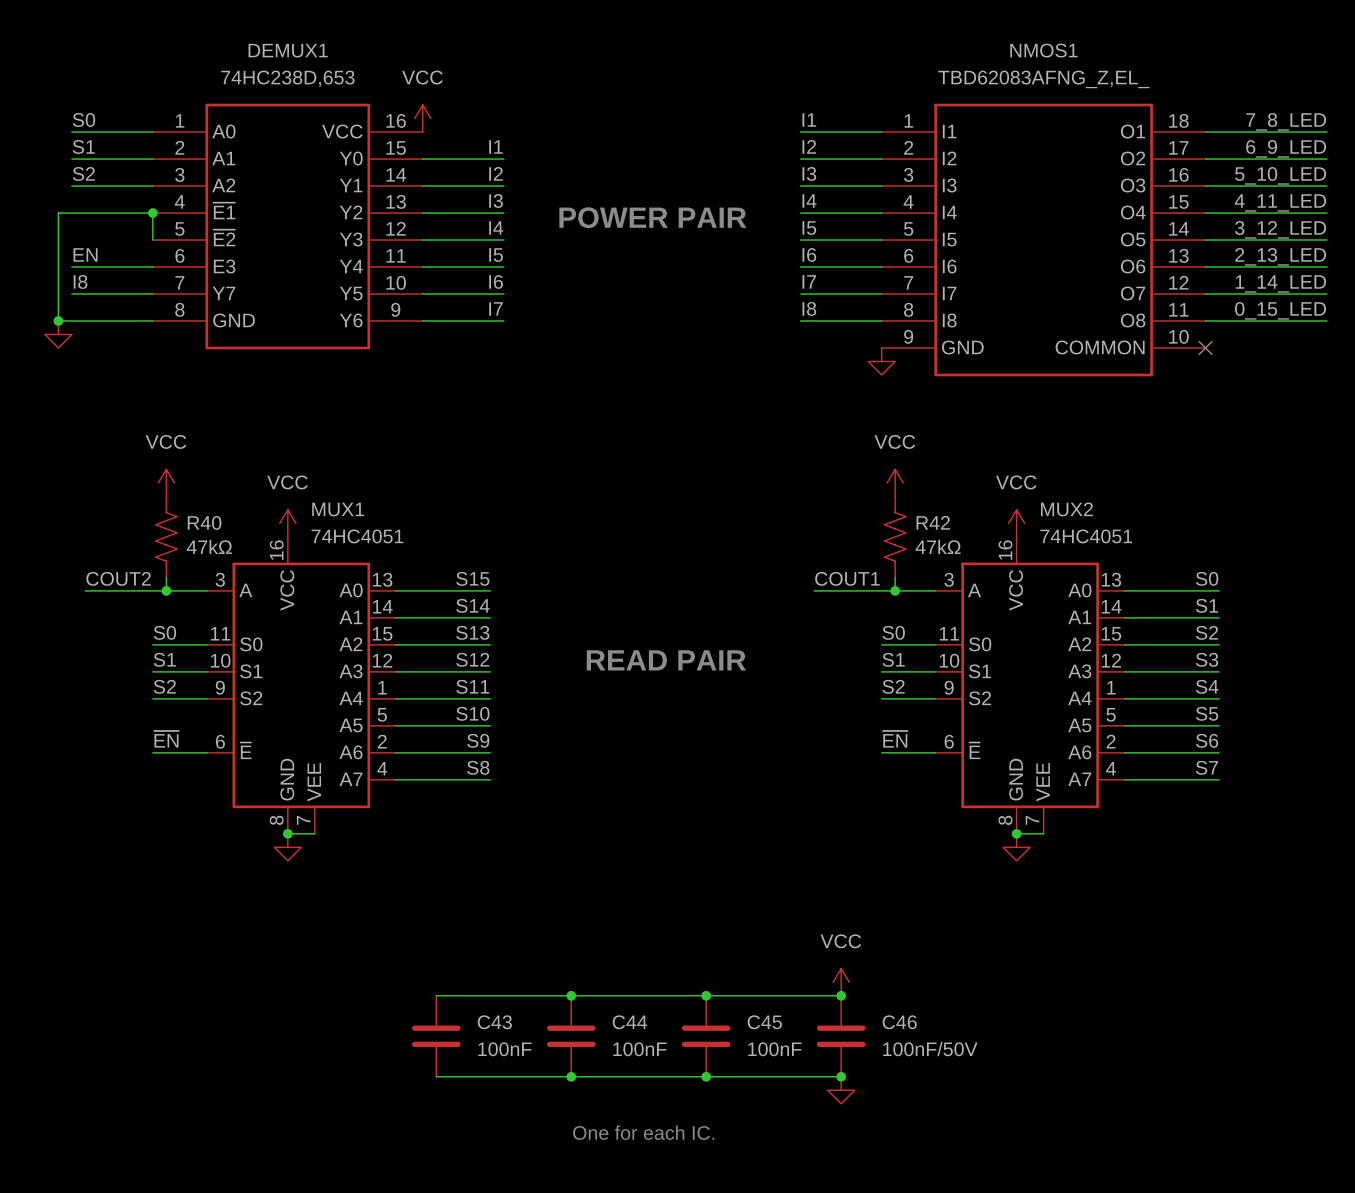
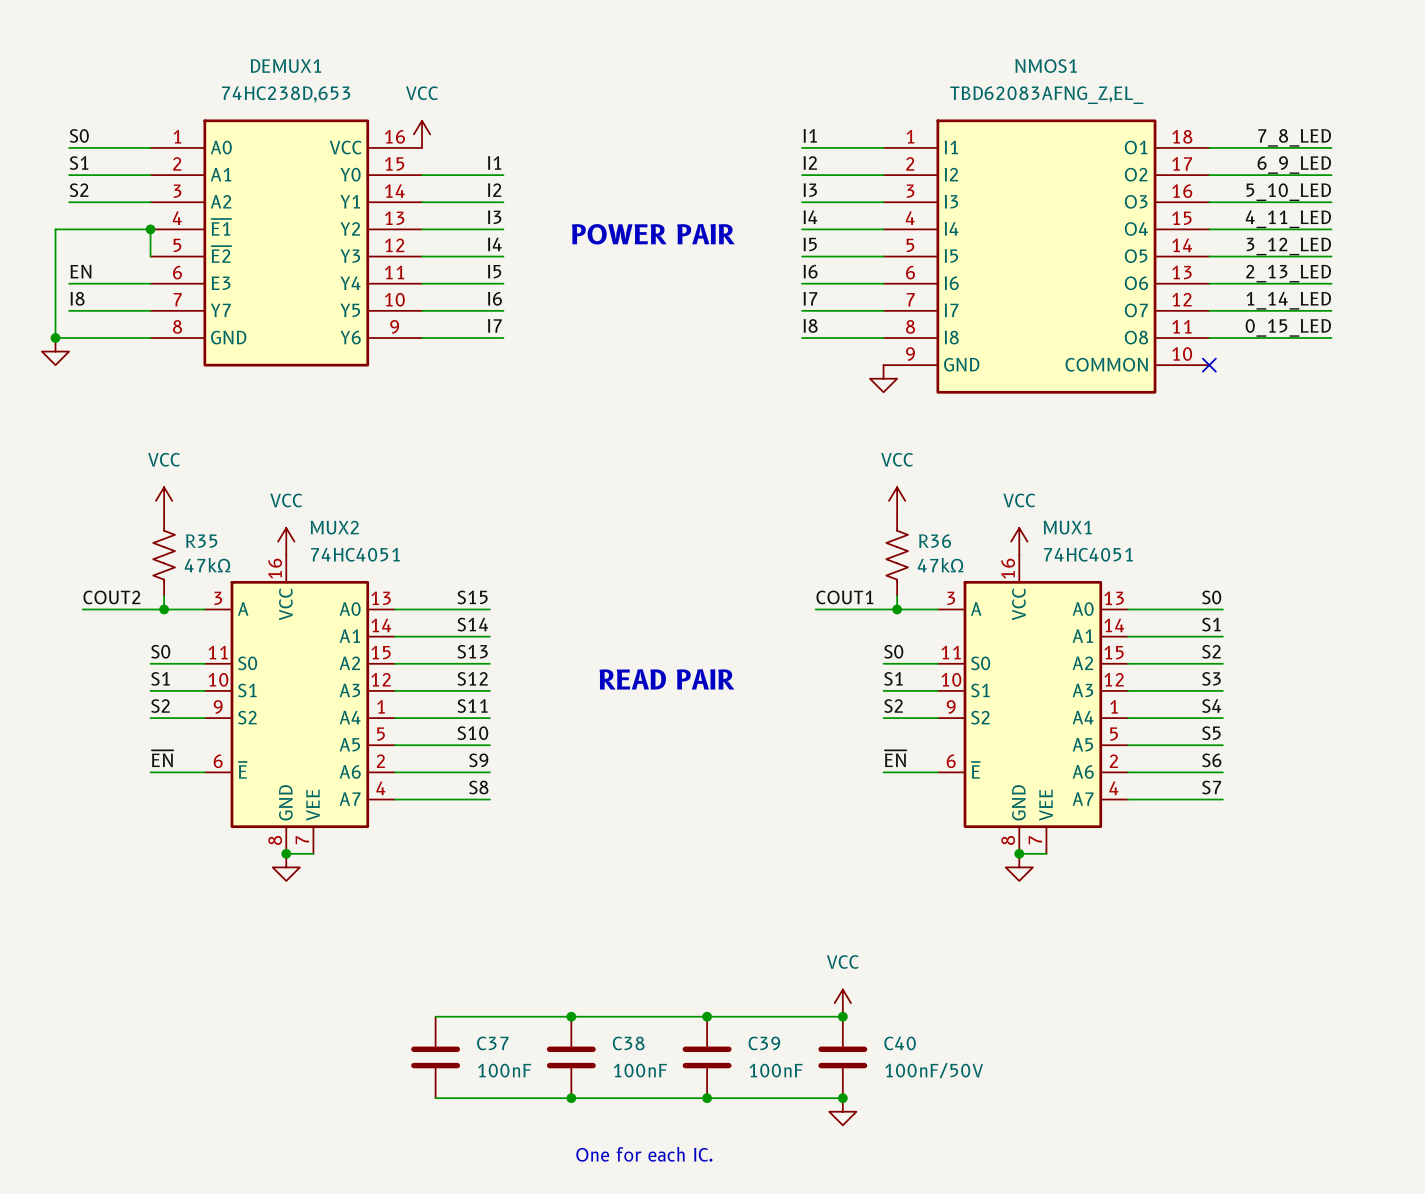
MUX1 name: MUX1 (338, 509) -> MUX2 (334, 527)
MUX2 name: MUX2 (1066, 509) -> MUX1 (1067, 527)
R40 name: R40 (204, 522) -> R35 (201, 541)
R42 name: R42 (933, 522) -> R36 (935, 541)
C43 name: C43 (494, 1022) -> C37 (492, 1043)
C44 name: C44 (629, 1022) -> C38 (628, 1043)
C45 name: C45 (764, 1022) -> C39 (764, 1043)
C46 name: C46 (899, 1022) -> C40 (900, 1043)

